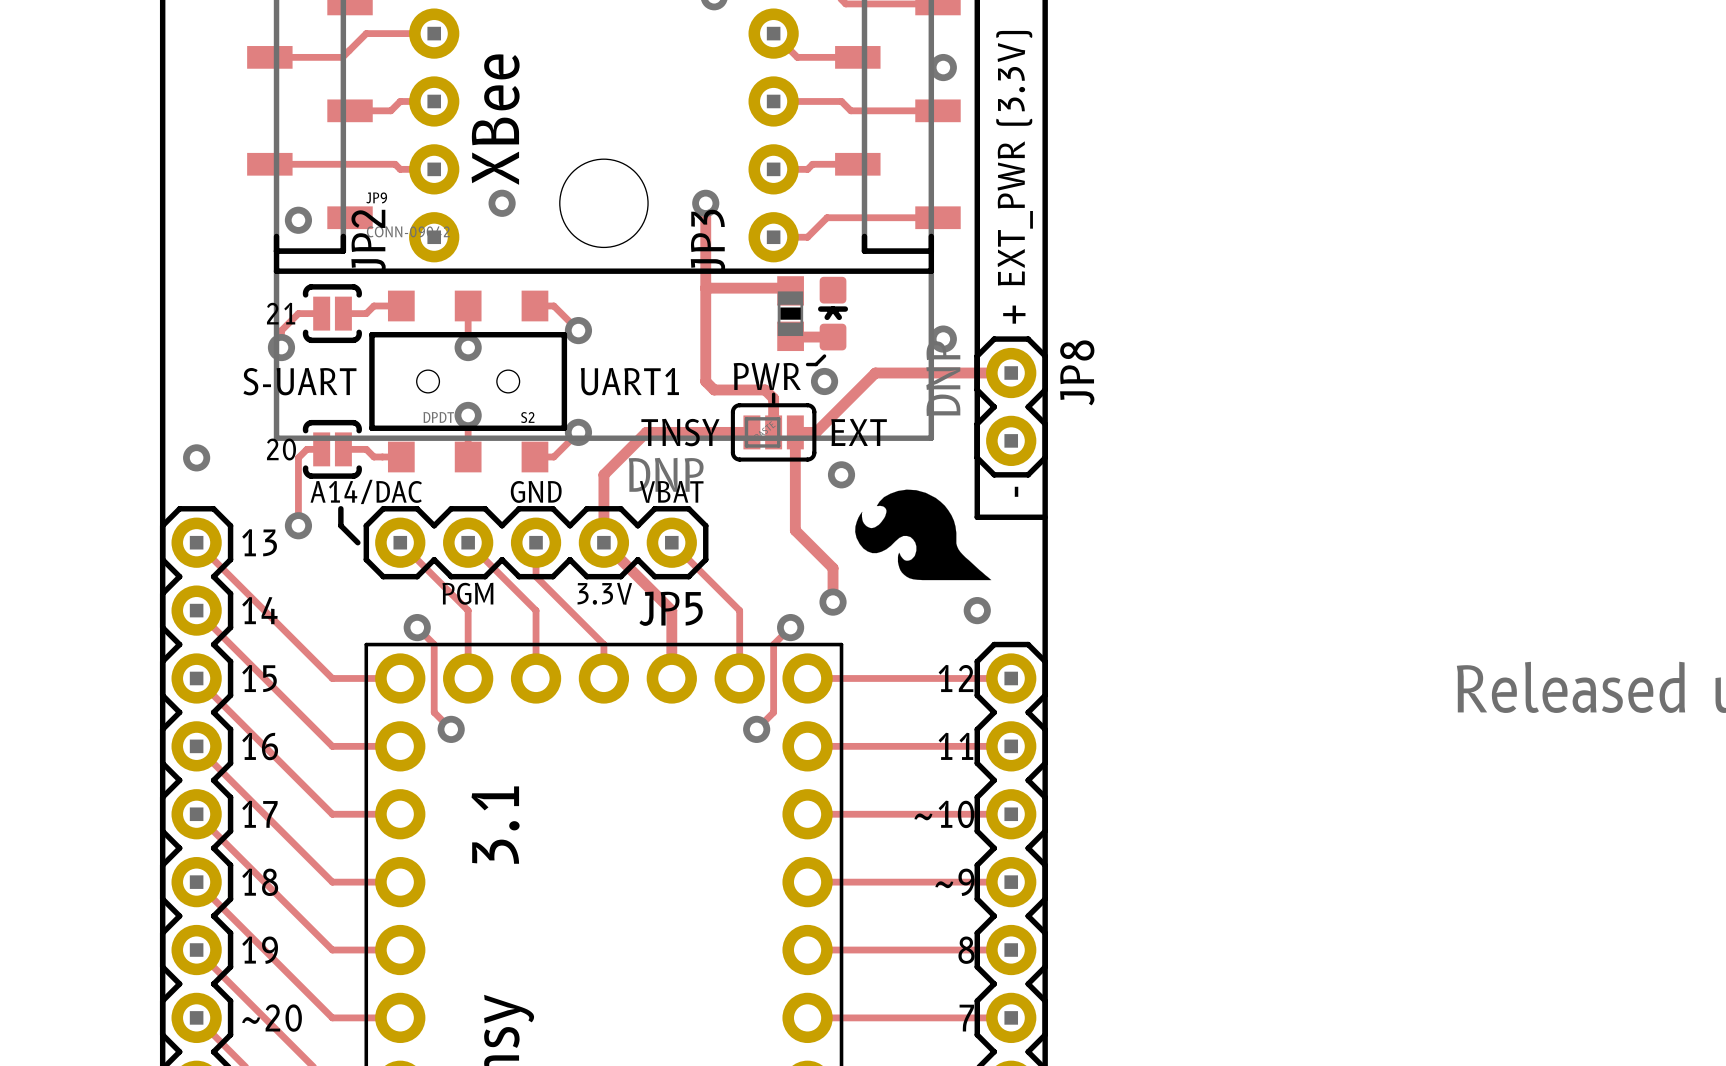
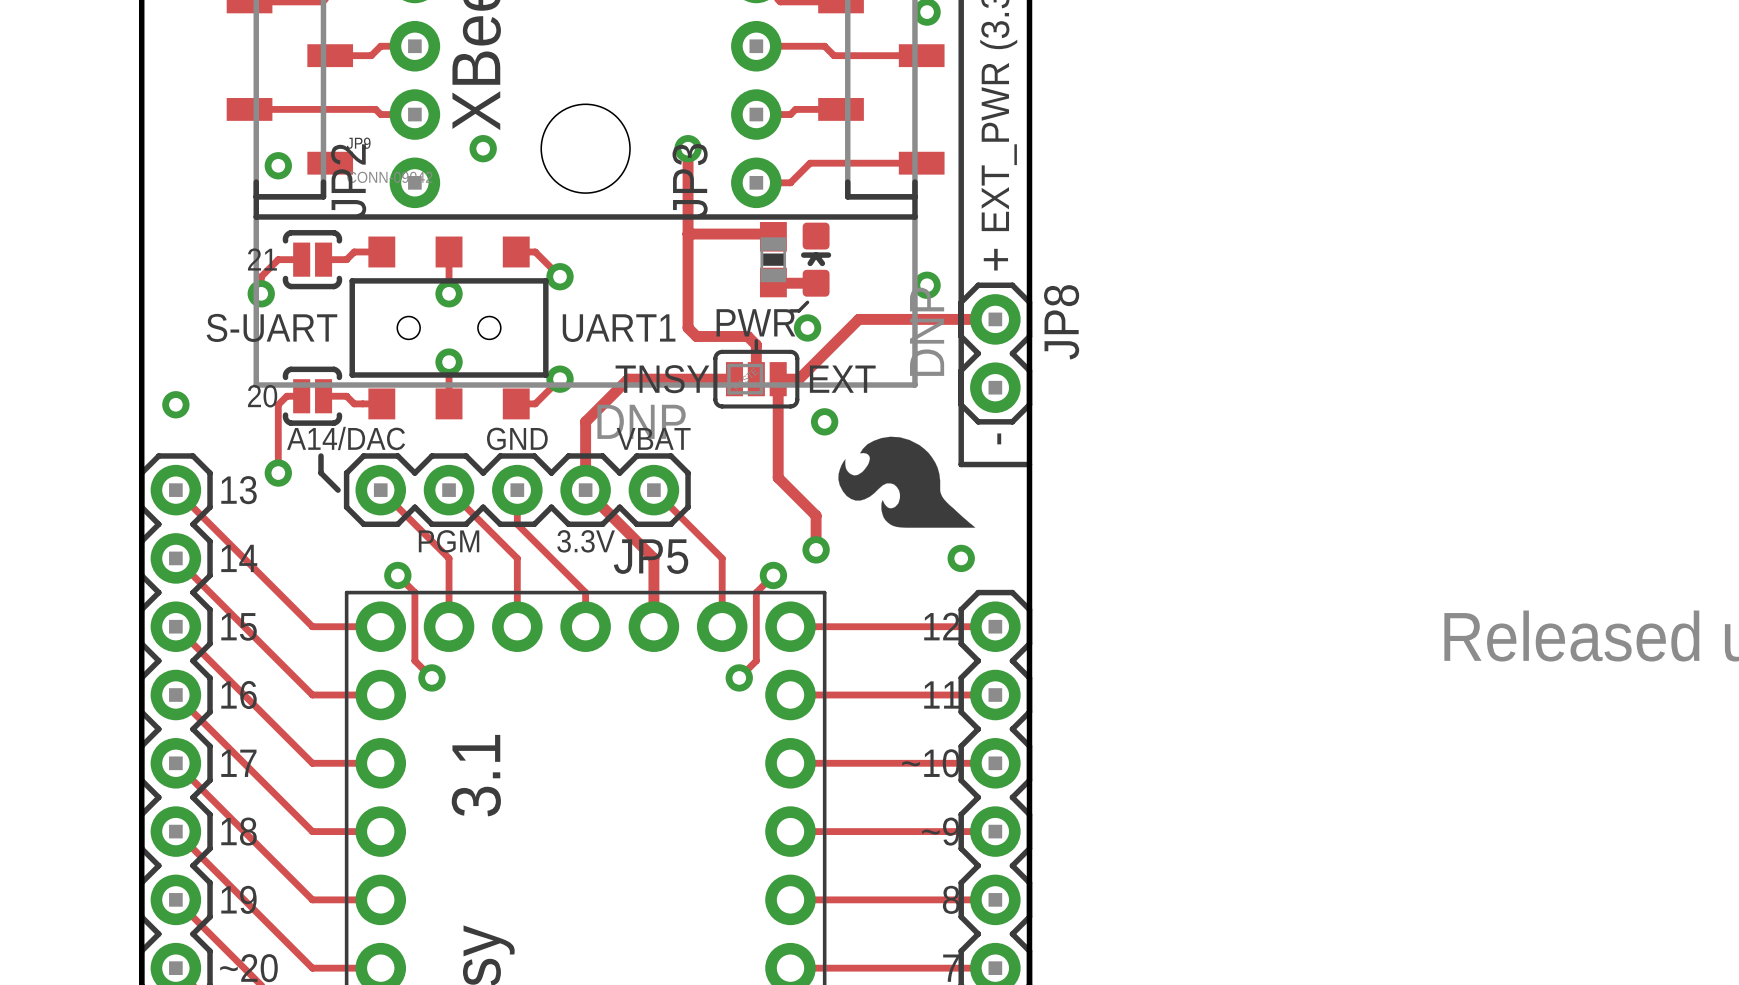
S2 value: DPDT (438, 417) -> none
S2 name: S2 (527, 417) -> none

